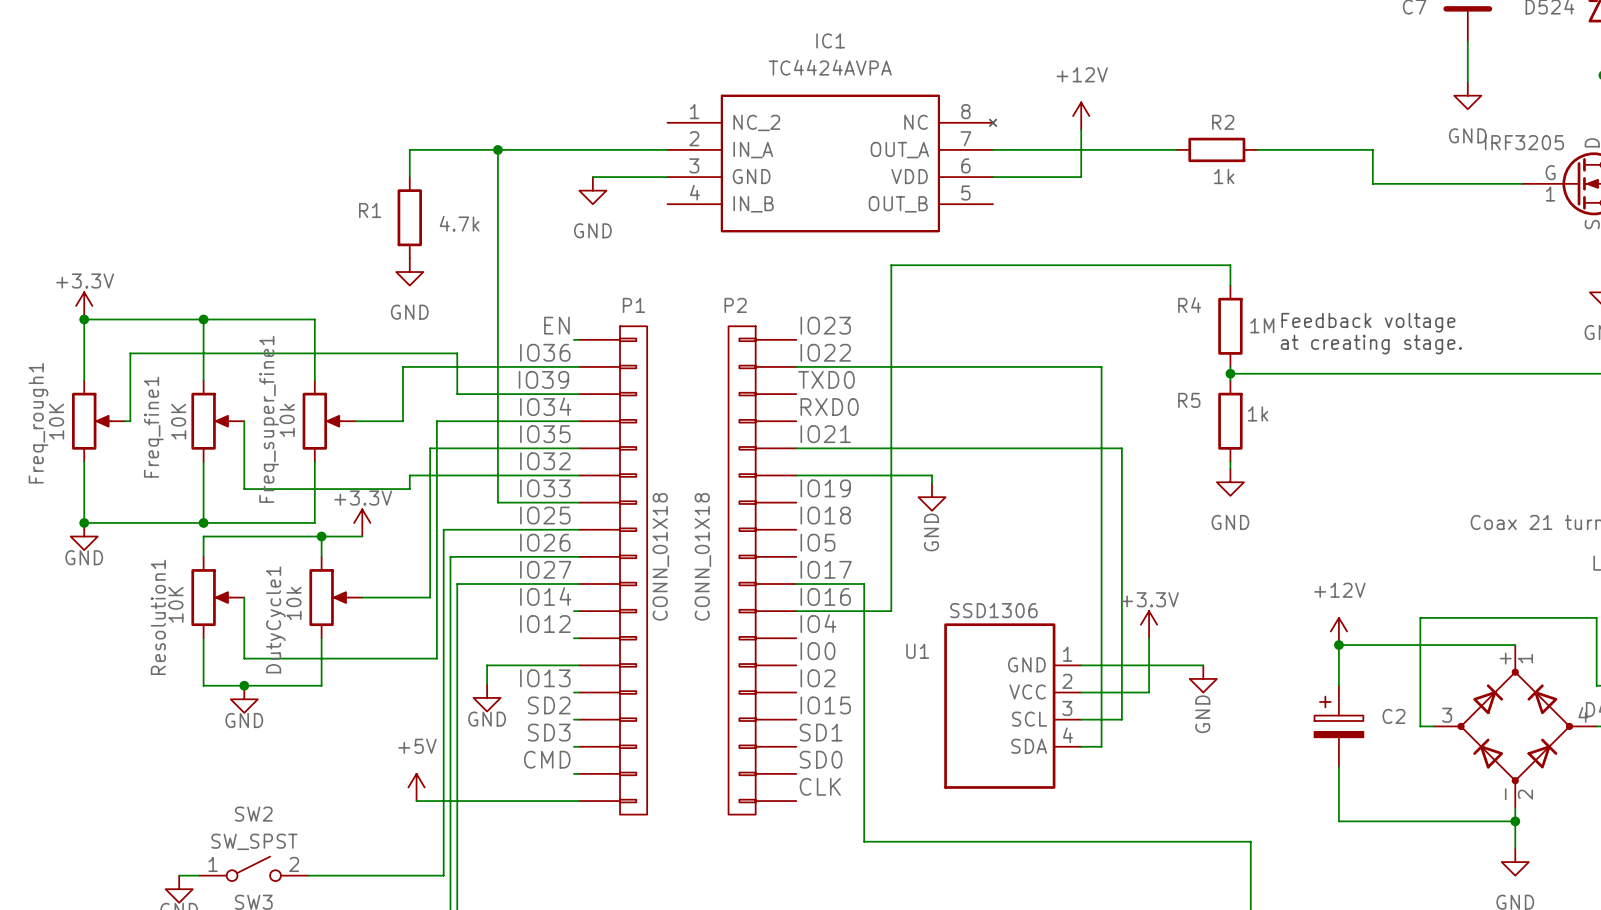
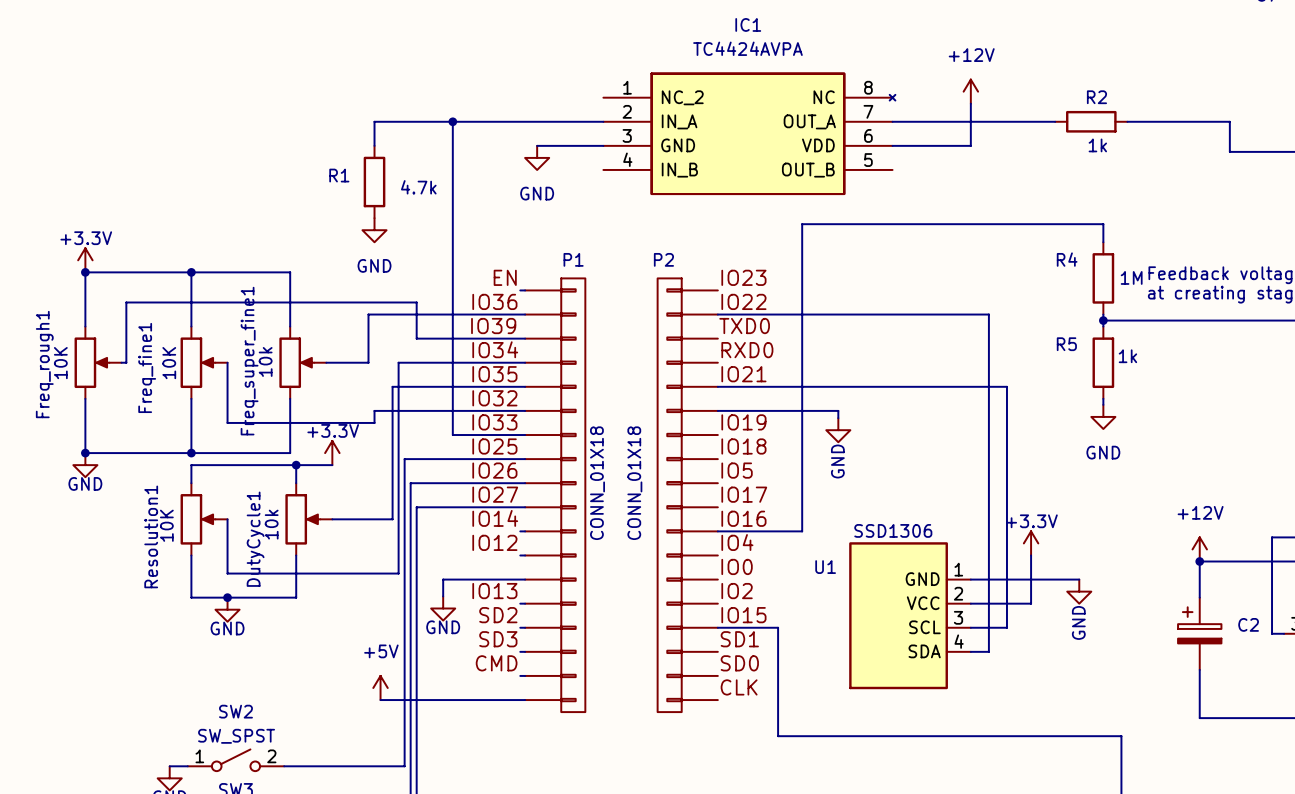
wire: (796, 584) (864, 584) (864, 719) -> (717, 627) (778, 627)

